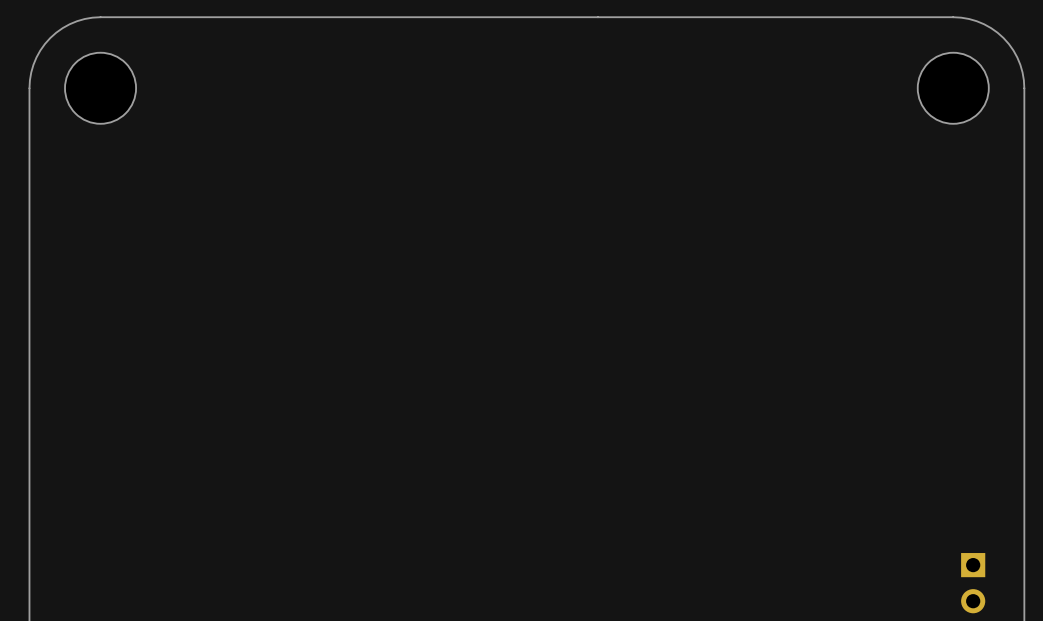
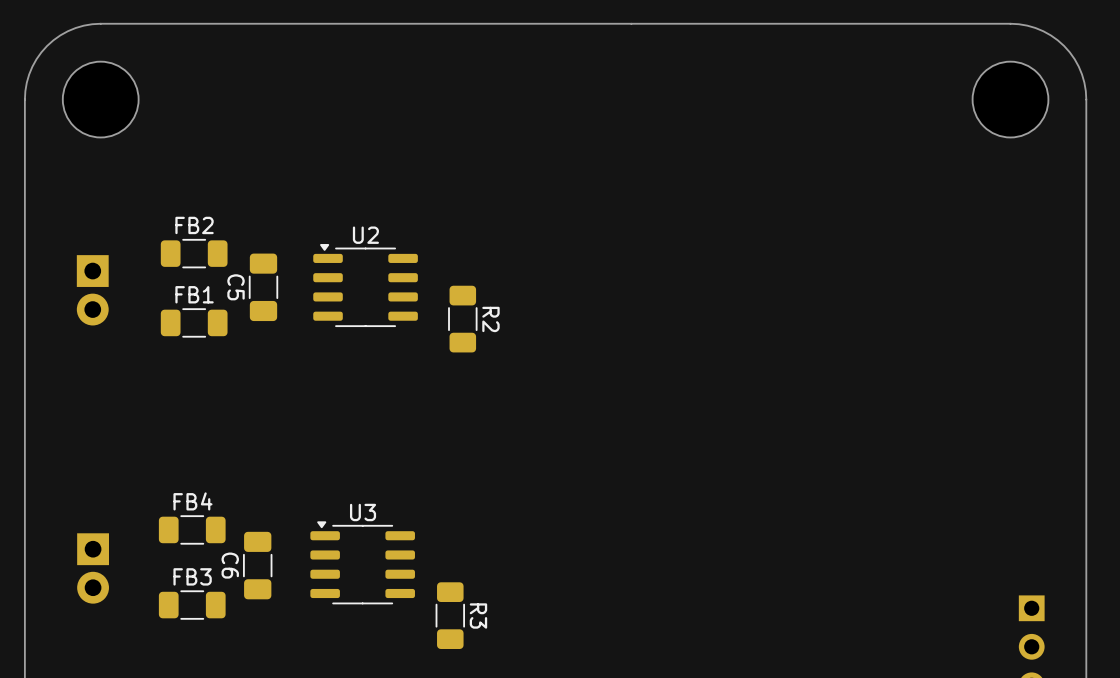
FB2: none -> (194, 253)
U2: none -> (365, 285)
C5: none -> (263, 287)
part: none -> (92, 290)
R2: none -> (462, 319)
FB1: none -> (194, 322)
FB4: none -> (192, 529)
U3: none -> (362, 562)
C6: none -> (257, 565)
part: none -> (93, 568)
FB3: none -> (192, 605)
R3: none -> (450, 615)

